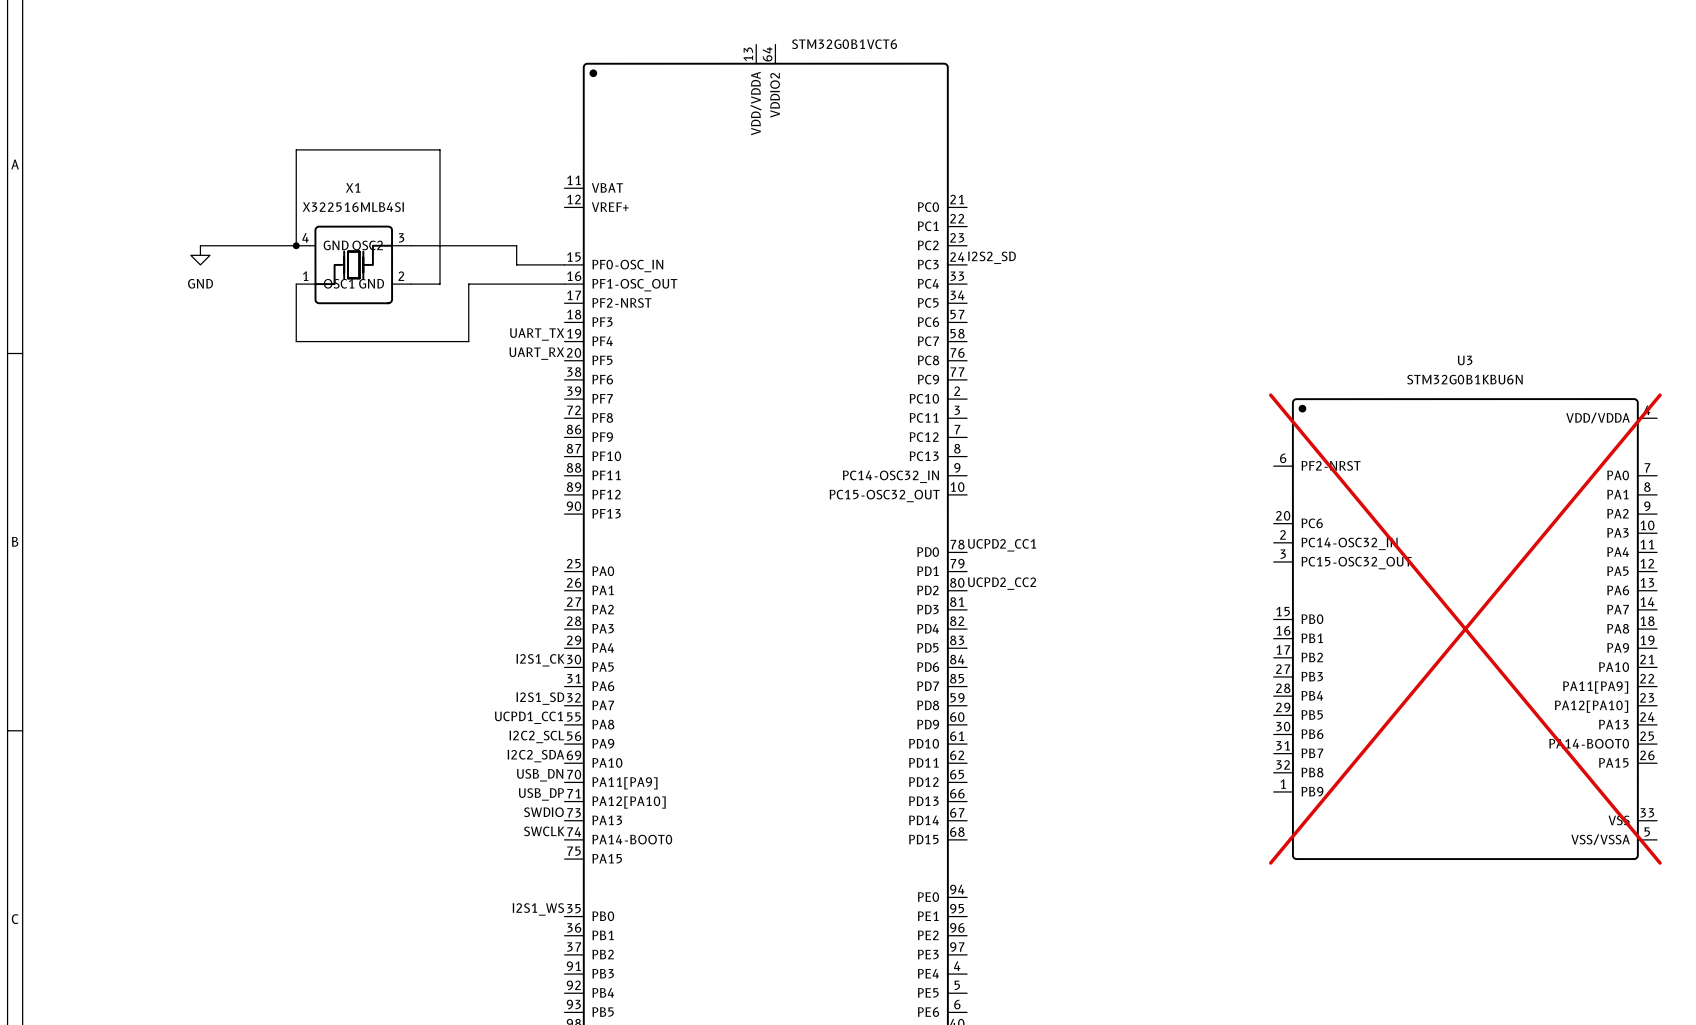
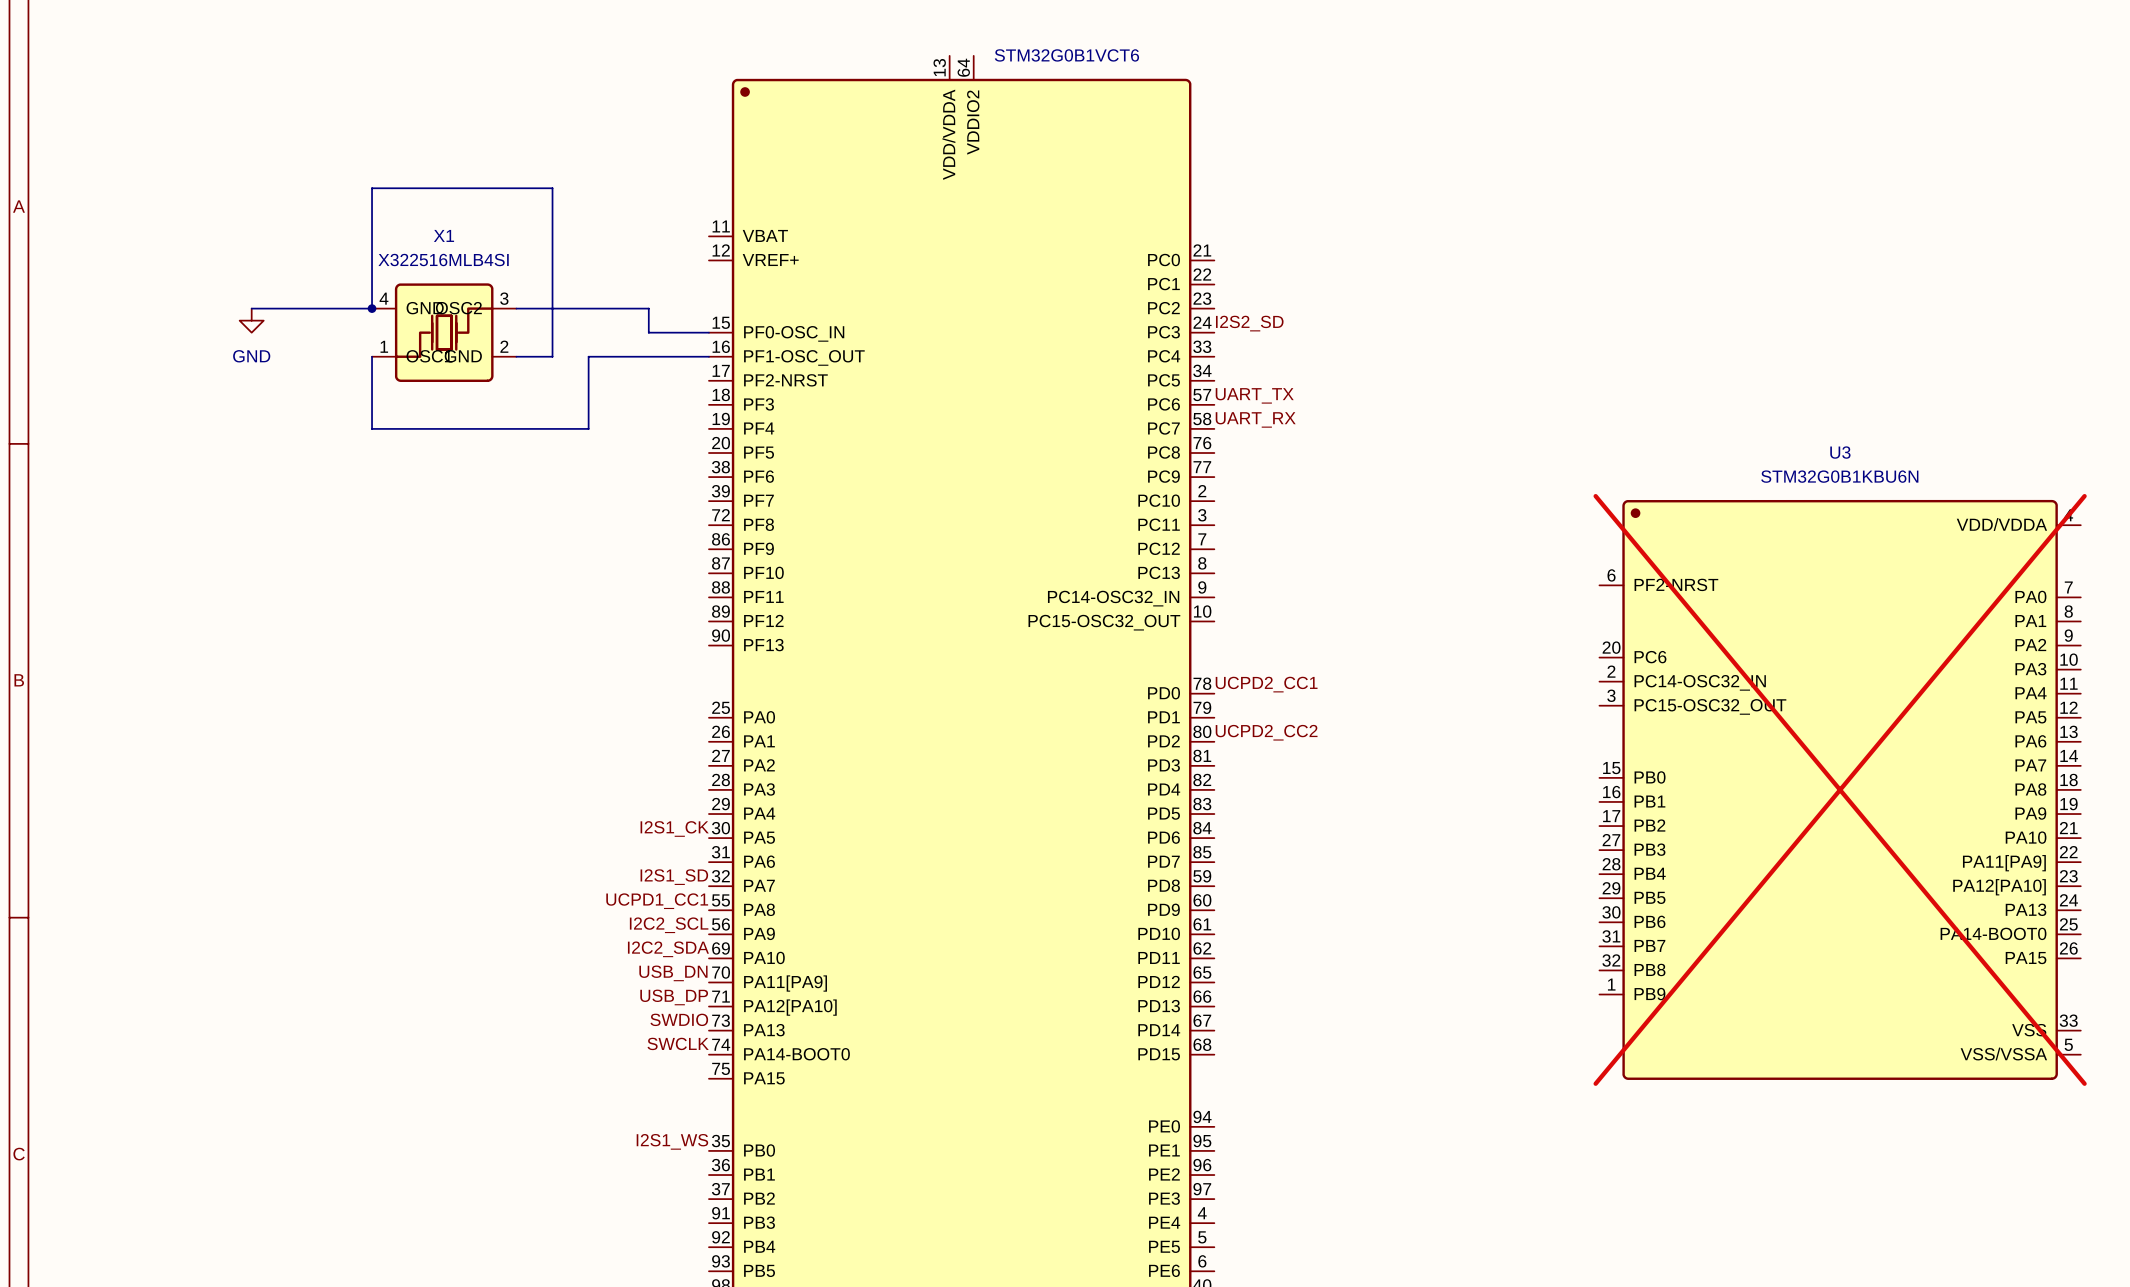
label: none -> UART_TX (1254, 395)
label: UART_TX (537, 334) -> none
label: none -> UART_RX (1255, 419)
label: UART_RX (536, 353) -> none

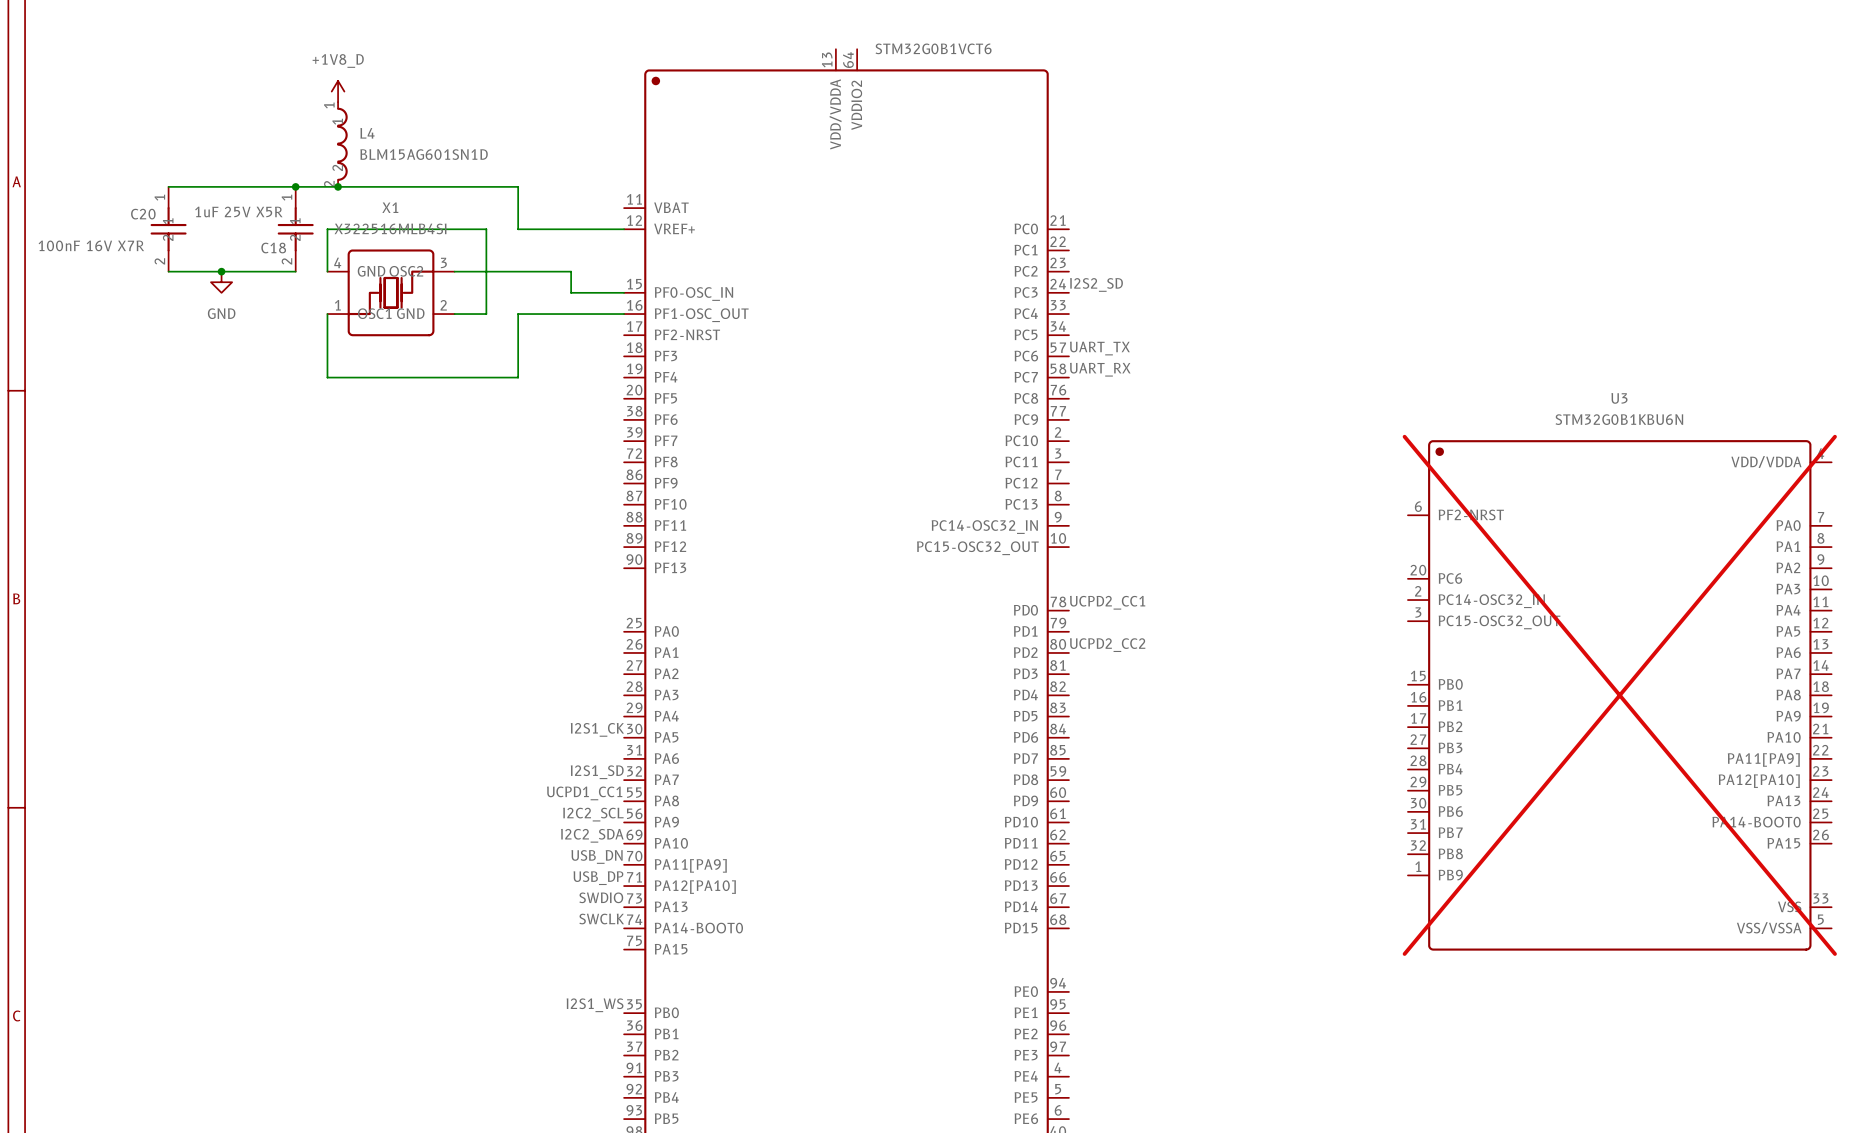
power symbol: none -> +1V8_D (338, 91)
L4: none -> BLM15AG601SN1D (342, 144)
wire: none -> (168, 186) (518, 186) (518, 229) (624, 229)
junction: none -> (295, 186)
junction: none -> (338, 186)
C20: none -> 100nF 16V X7R (168, 229)
C18: none -> 1uF 25V X5R (295, 229)
wire: (372, 260) (372, 188) (552, 188) (552, 260) -> (327, 229) (486, 229)
wire: none -> (168, 271) (221, 271)
junction: none -> (221, 271)
wire: (335, 308) (372, 308) -> none
junction: (372, 308) -> none

